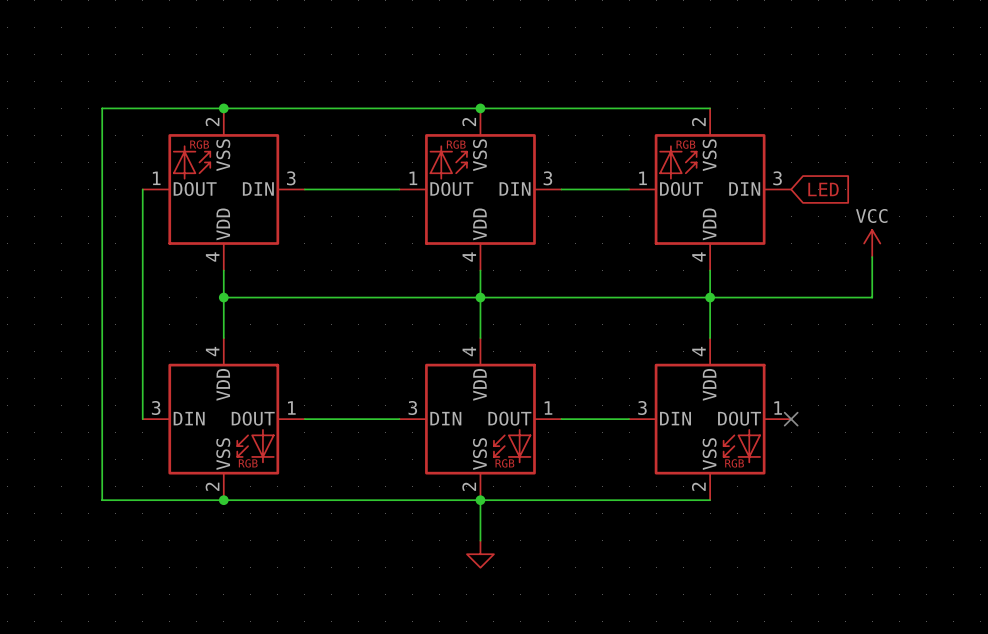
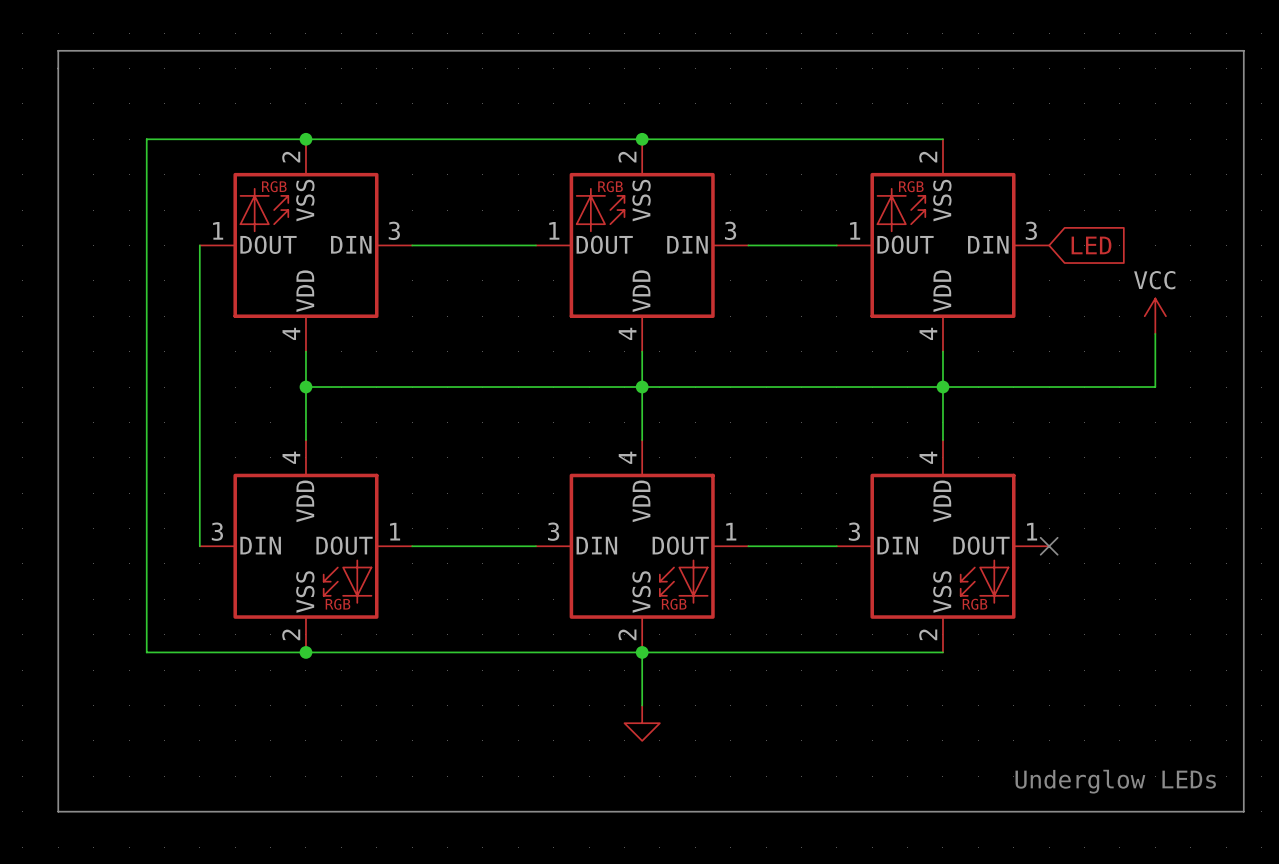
line: none -> (58, 50) (1243, 50) (1243, 811) (58, 811) (58, 50)
text: none -> Underglow LEDs (1115, 781)

